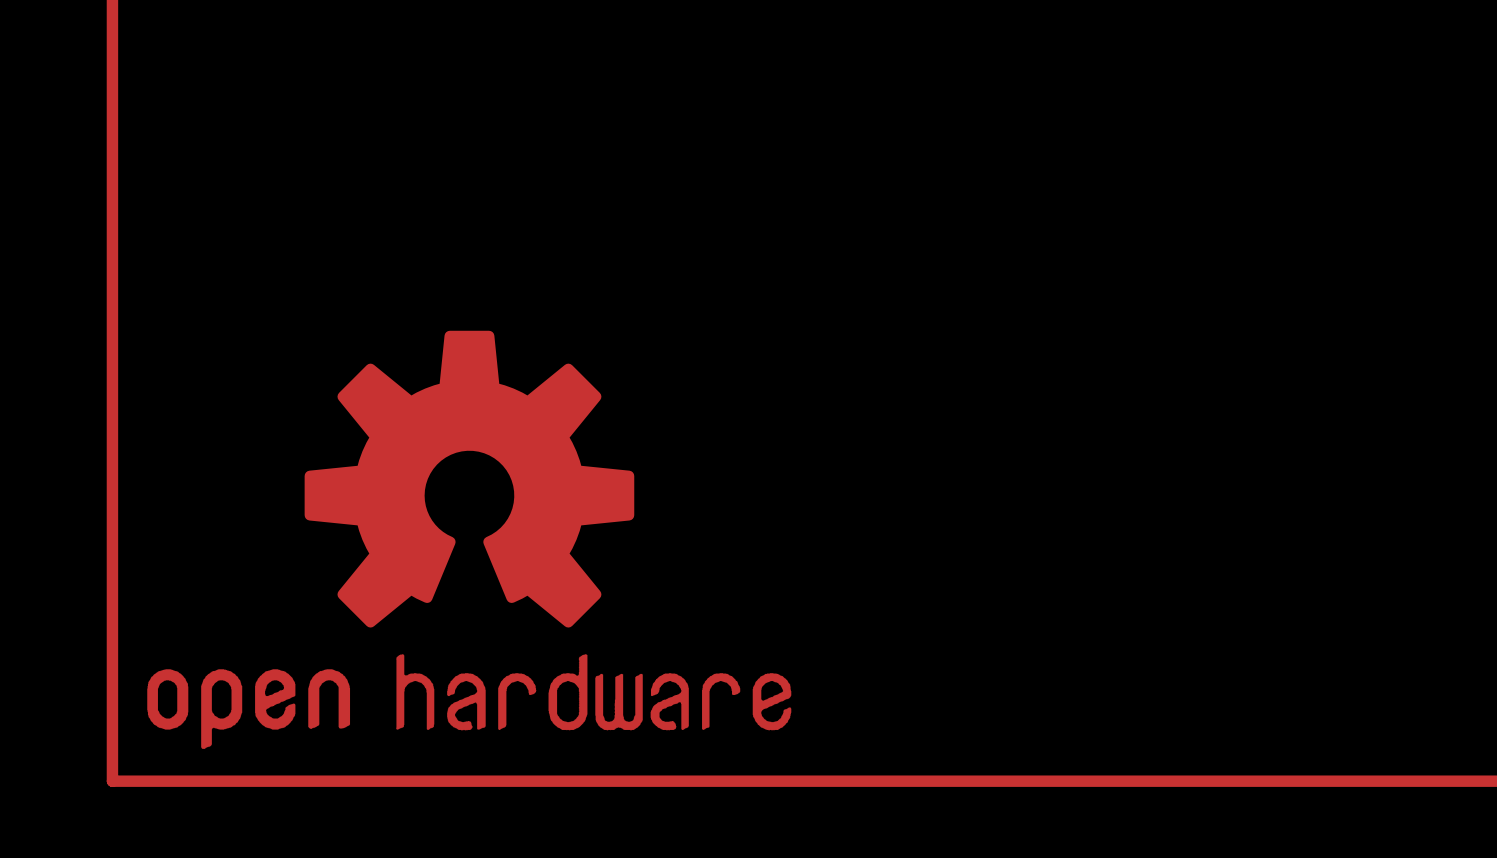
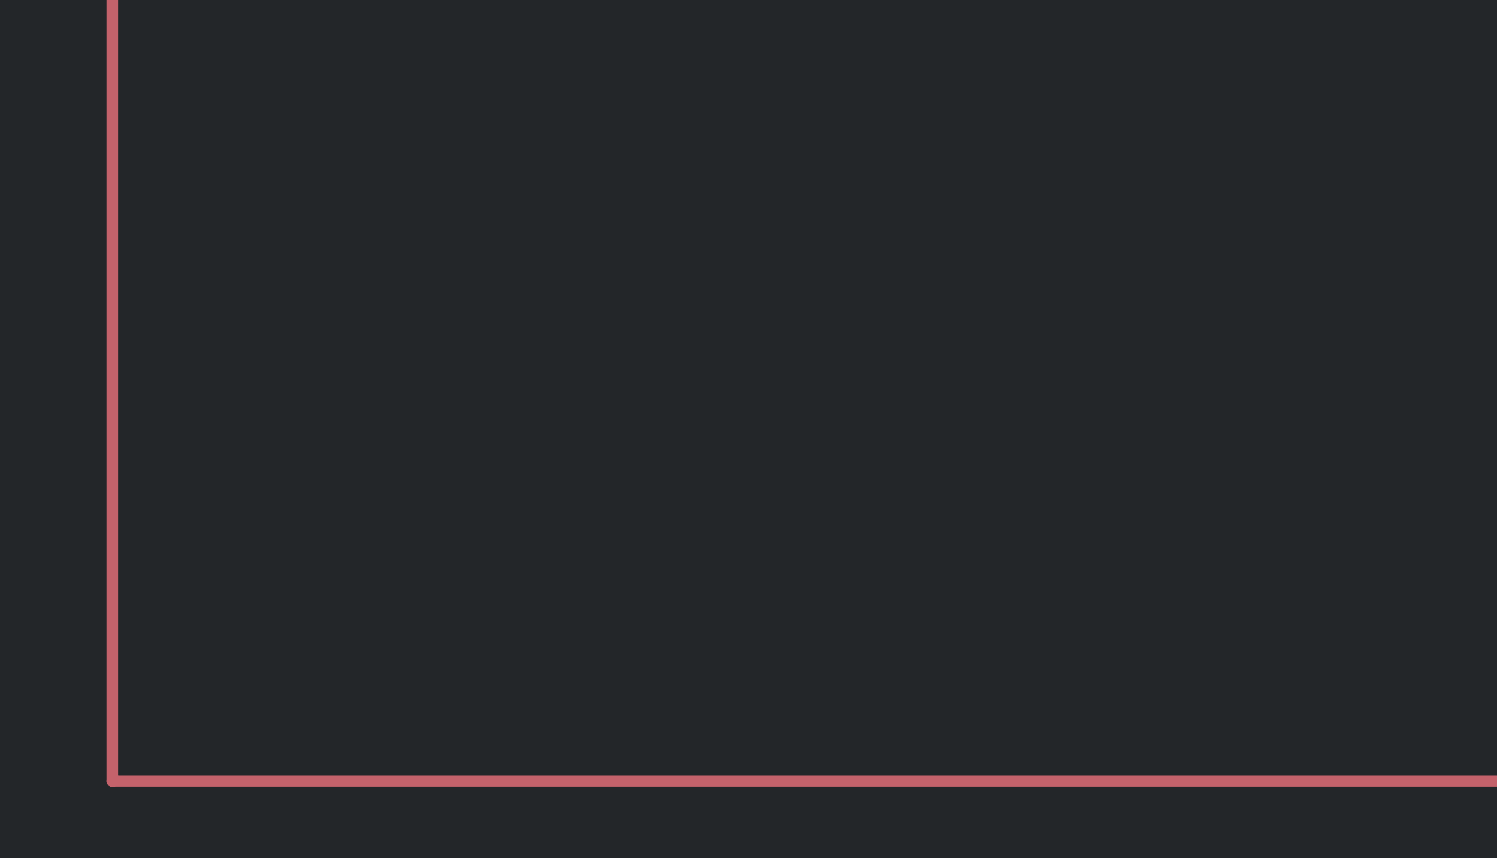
part: (469, 539) -> none

